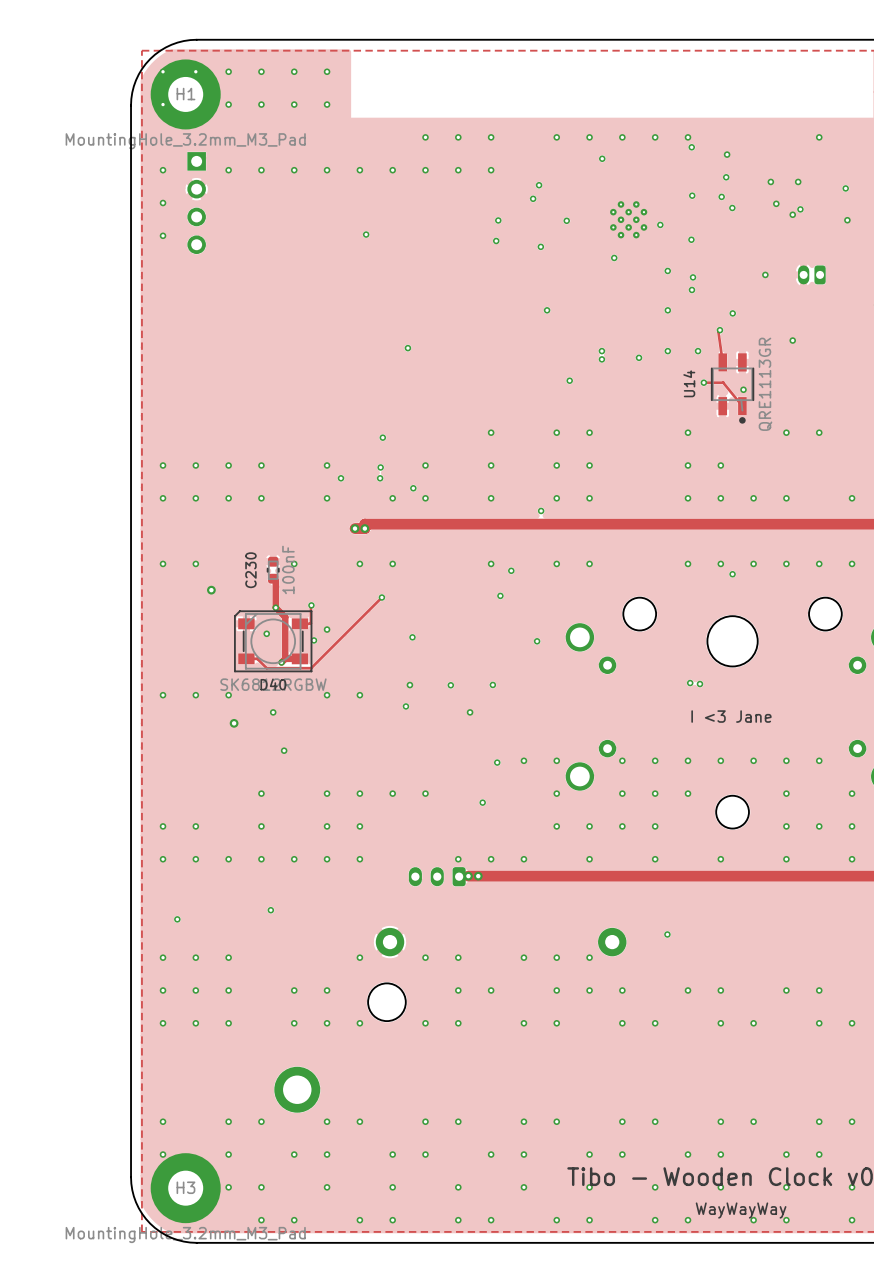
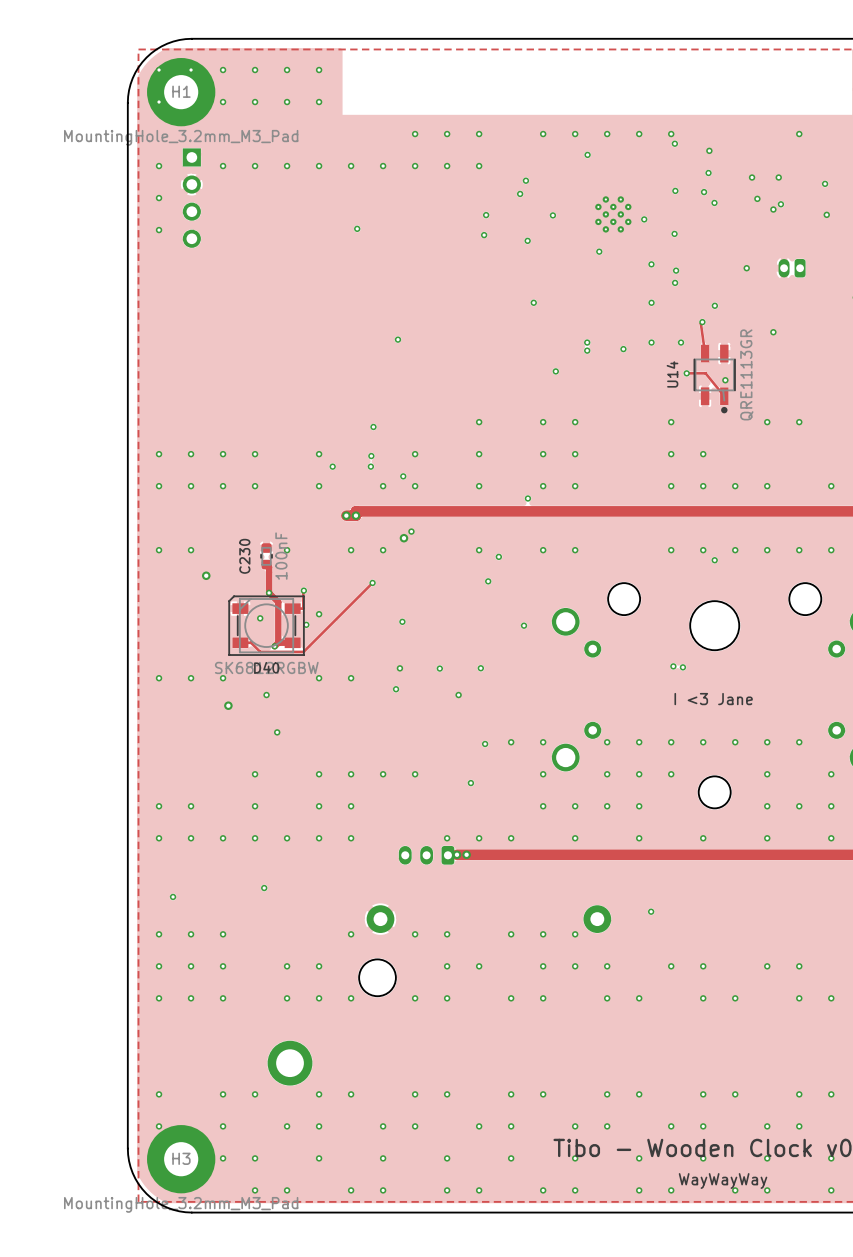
via: none -> (411, 531)
via: none -> (403, 538)

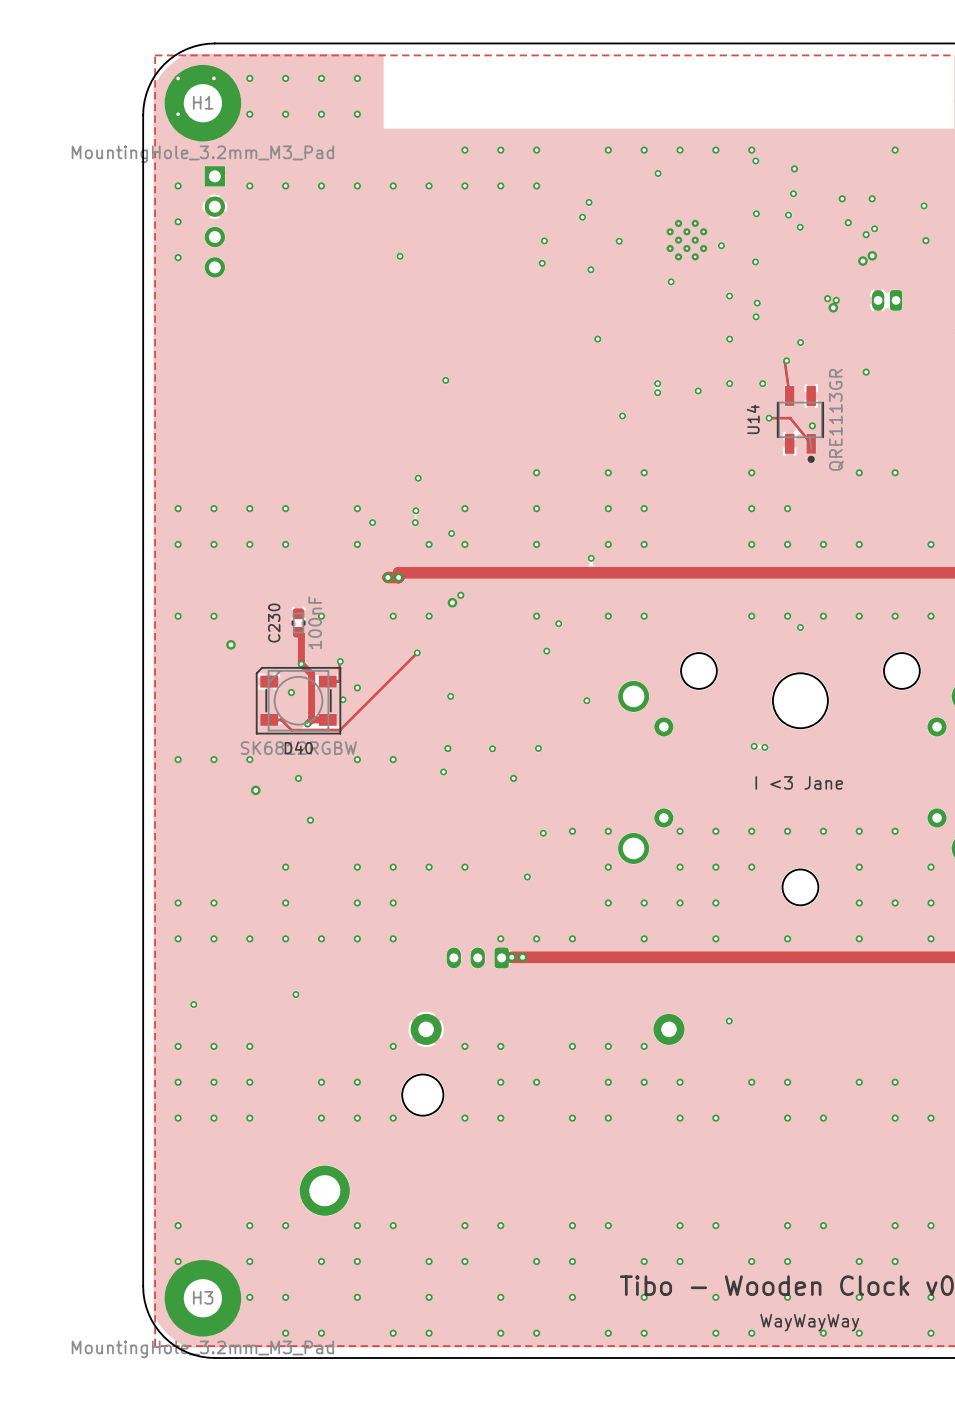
via: none -> (872, 255)
via: none -> (862, 261)
via: none -> (827, 298)
via: none -> (833, 307)

